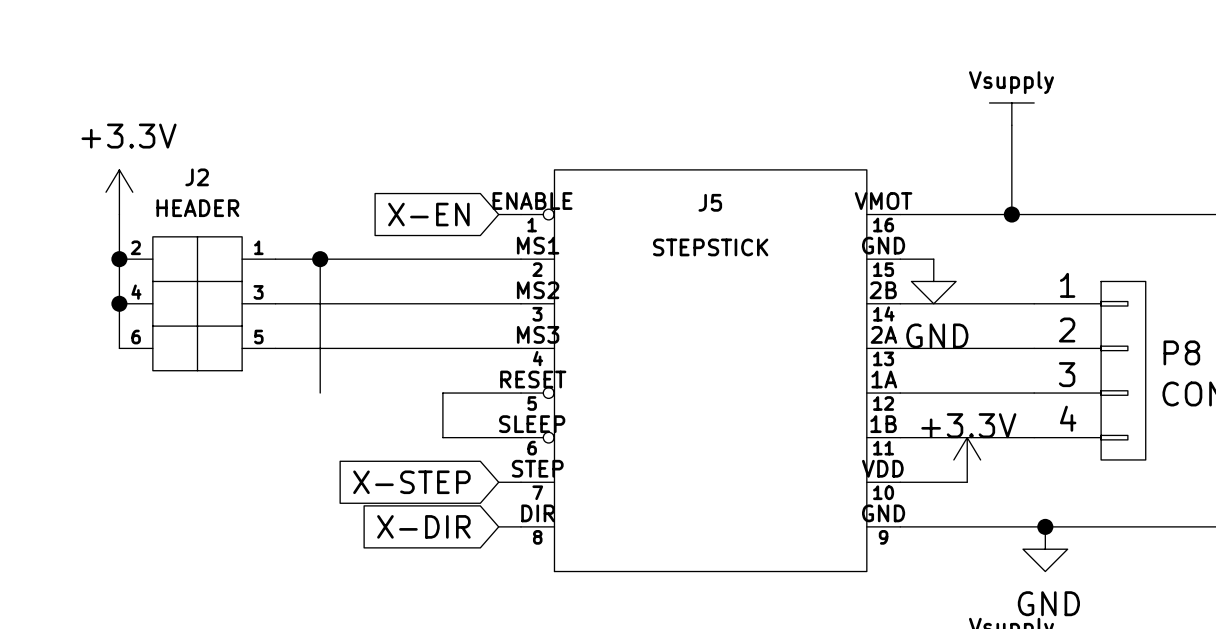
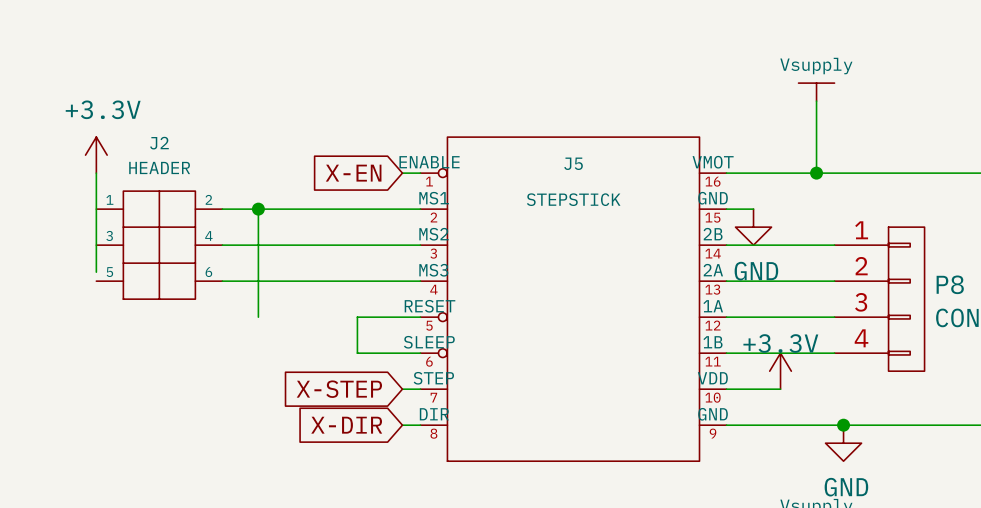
junction: (119, 259) -> none
junction: (119, 303) -> none
J2 flip: as is (197, 303) -> left-right (159, 245)
wire: (119, 337) (119, 348) -> none

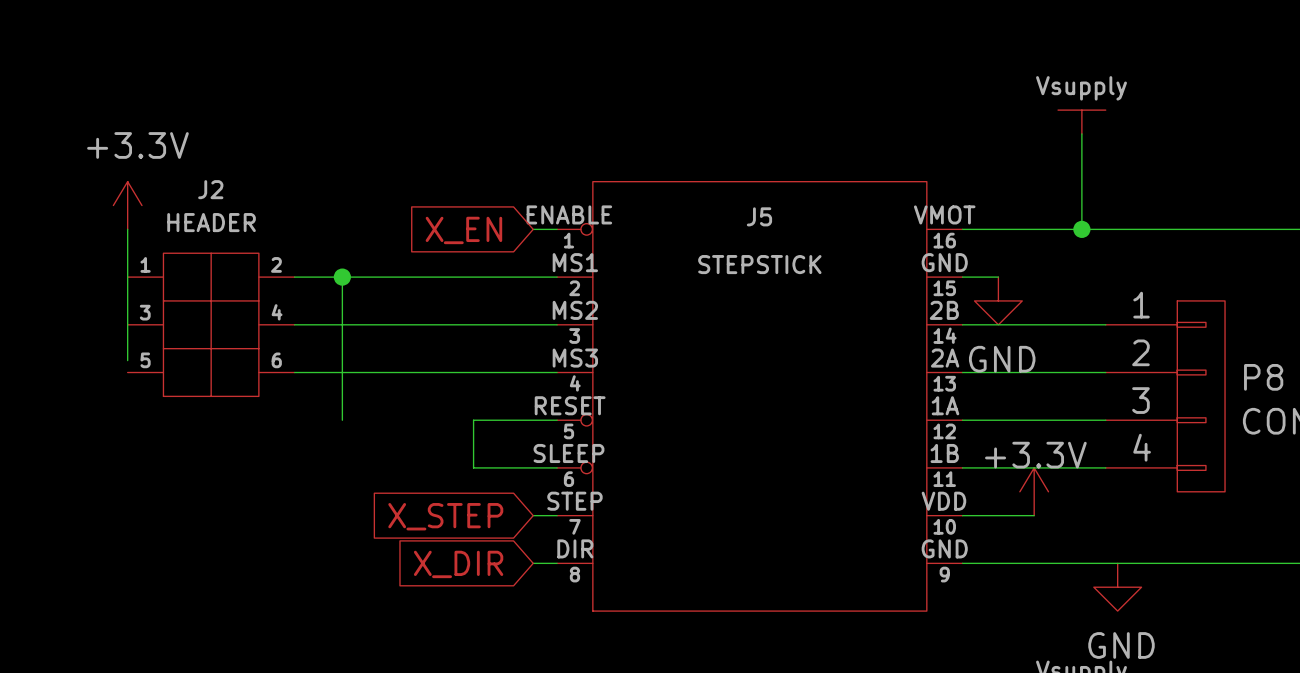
global label: X-EN (353, 173) -> X_EN (463, 230)
global label: X-STEP (339, 389) -> X_STEP (445, 516)
global label: X-DIR (346, 425) -> X_DIR (458, 564)
junction: (843, 425) -> none

